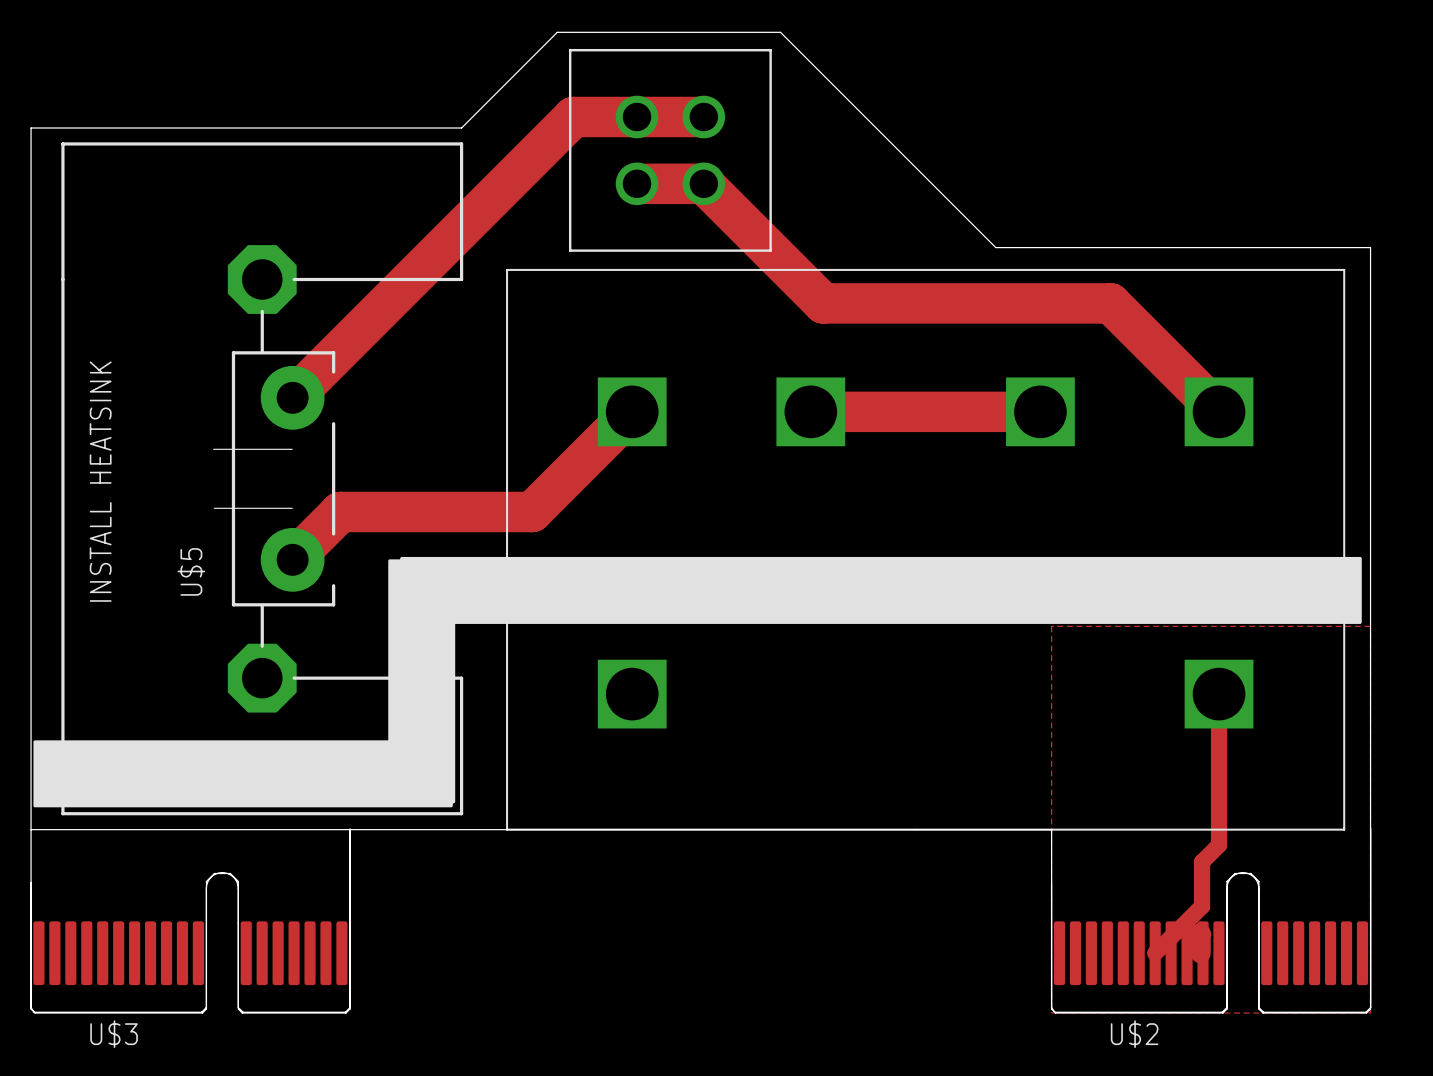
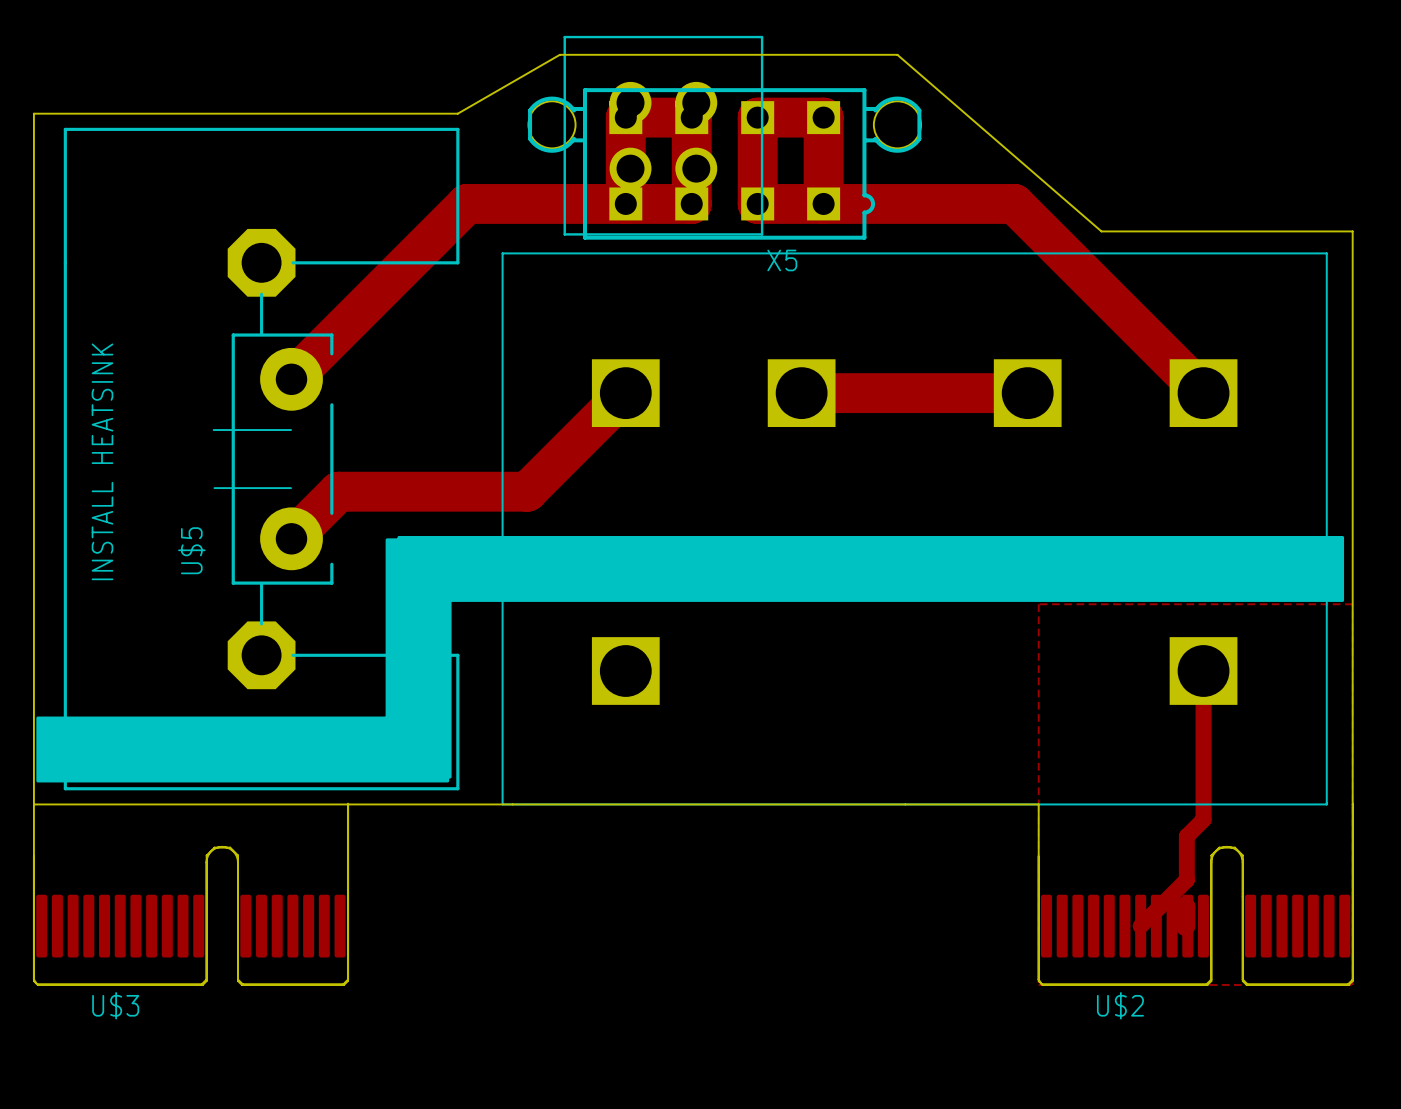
track: (703, 117) (573, 117) (470, 219) -> (625, 203) (625, 117) (691, 117) (691, 203) (466, 203)
board edge: (461, 128) (557, 32) (780, 32) (995, 247) (1115, 247) -> (457, 113) (559, 54) (897, 54) (1101, 231)
X5: none -> (724, 163)
track: (644, 183) (703, 183) (823, 303) (1110, 303) -> (823, 203) (823, 117) (757, 117) (757, 203) (1014, 203) (1096, 286)

